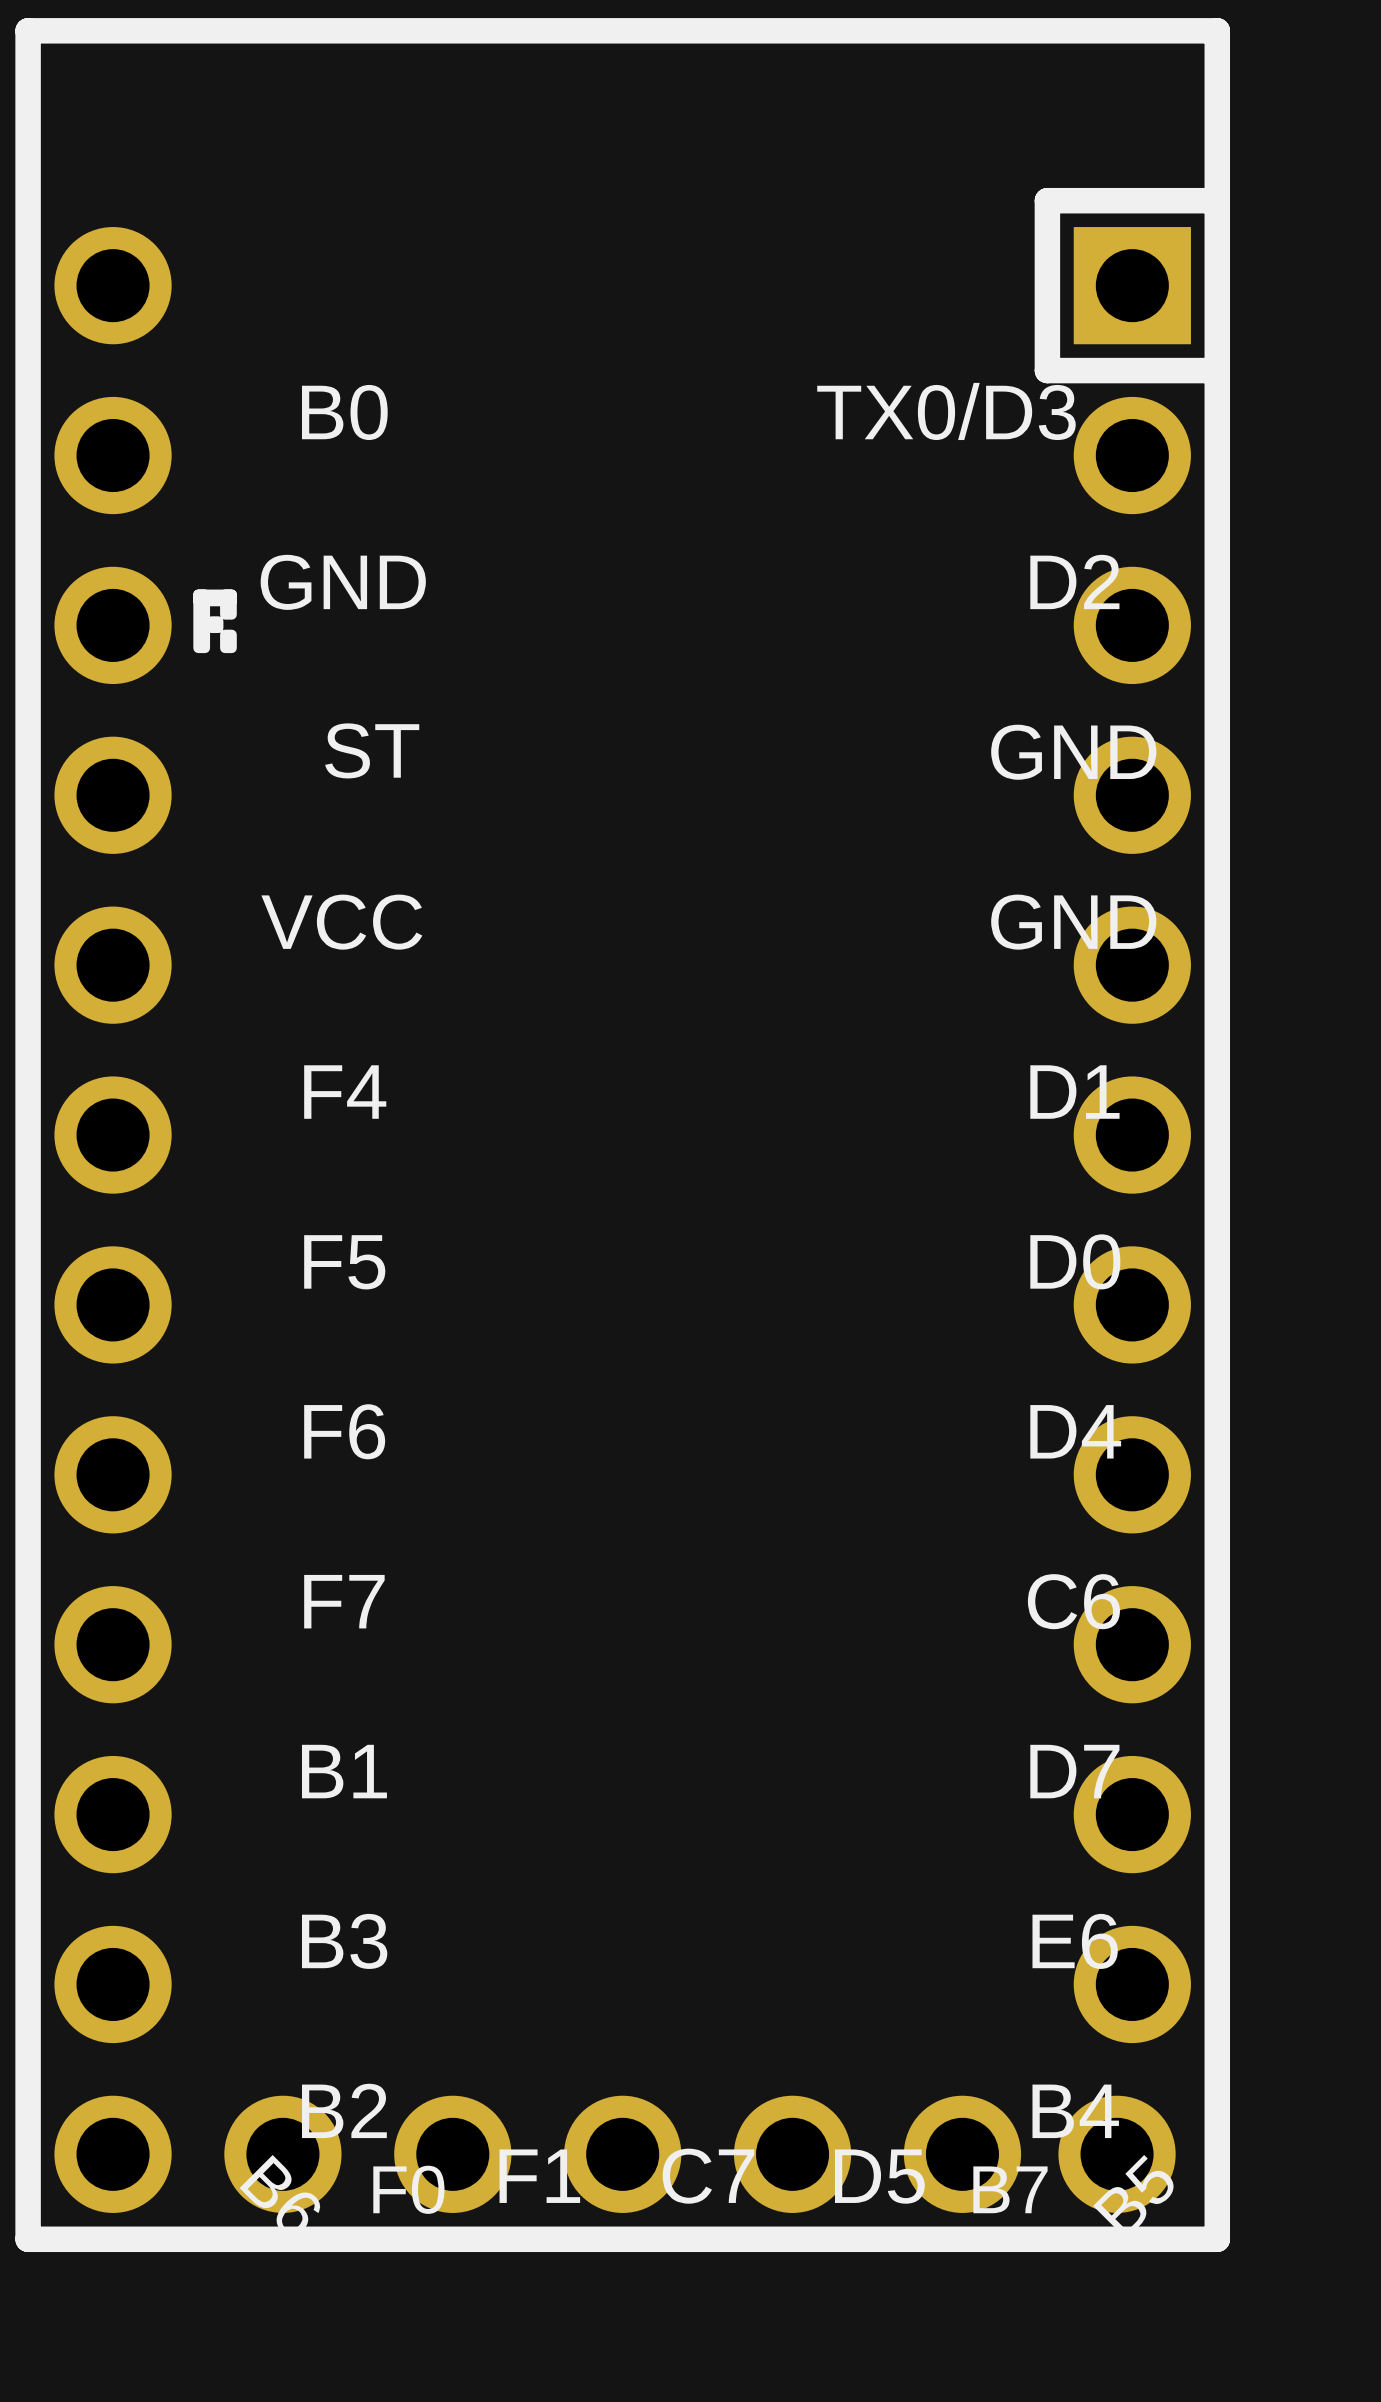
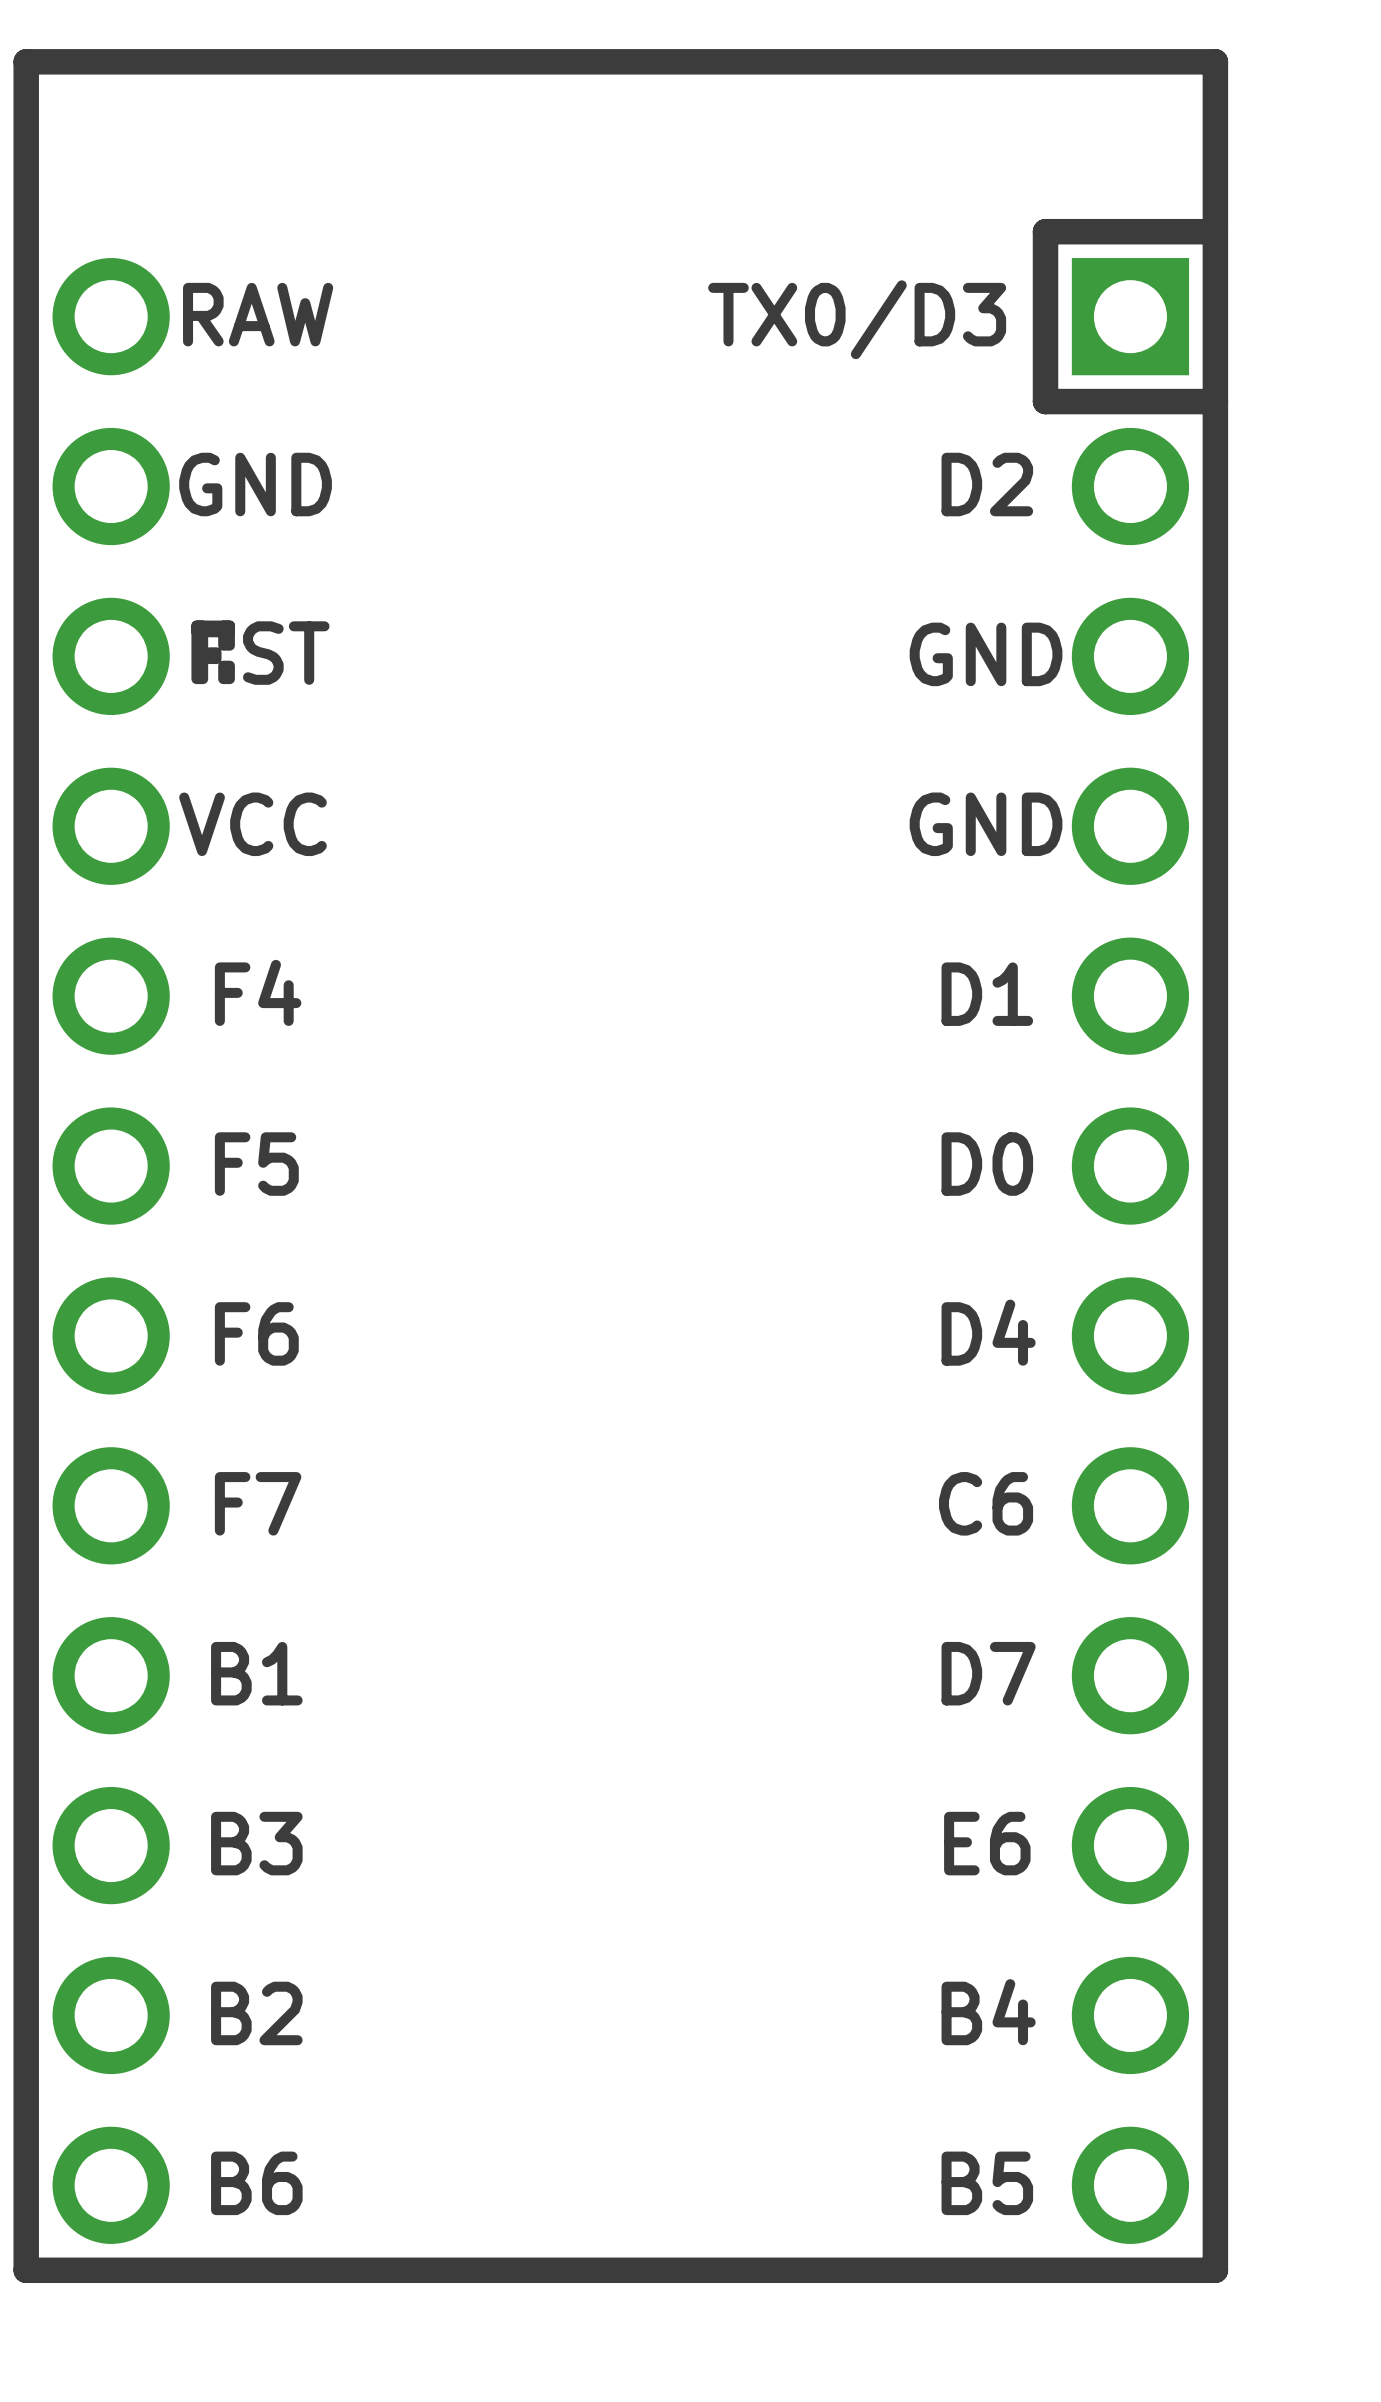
part footprint: [15, 18, 1231, 2253] -> [13, 49, 1229, 2284]

